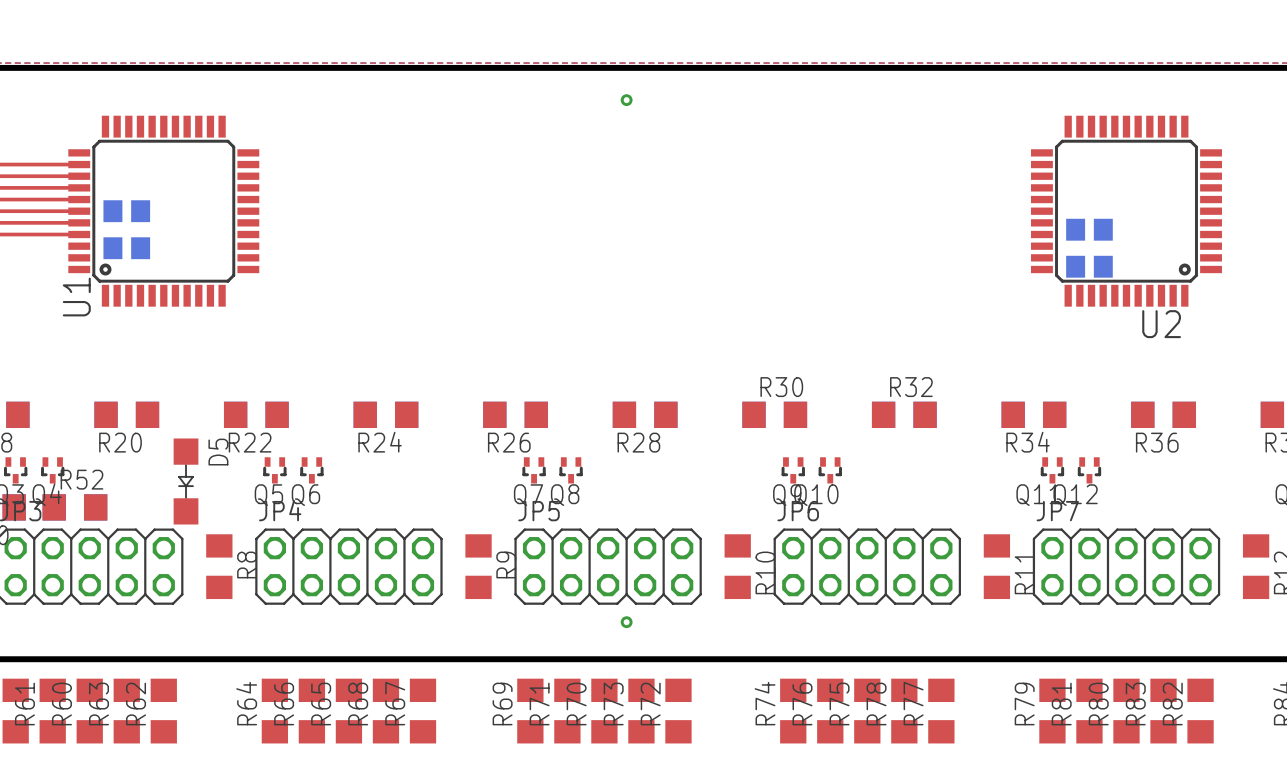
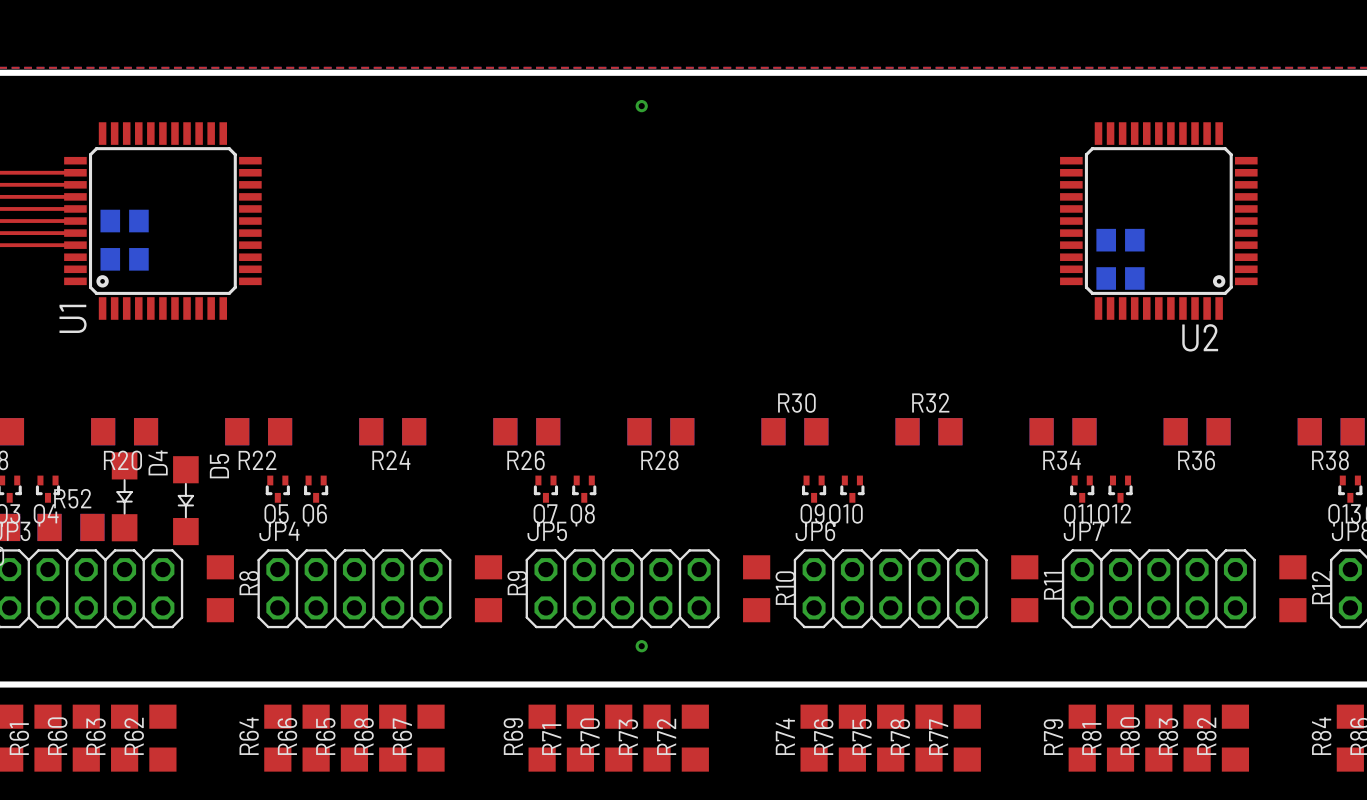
D4: none -> (124, 496)

